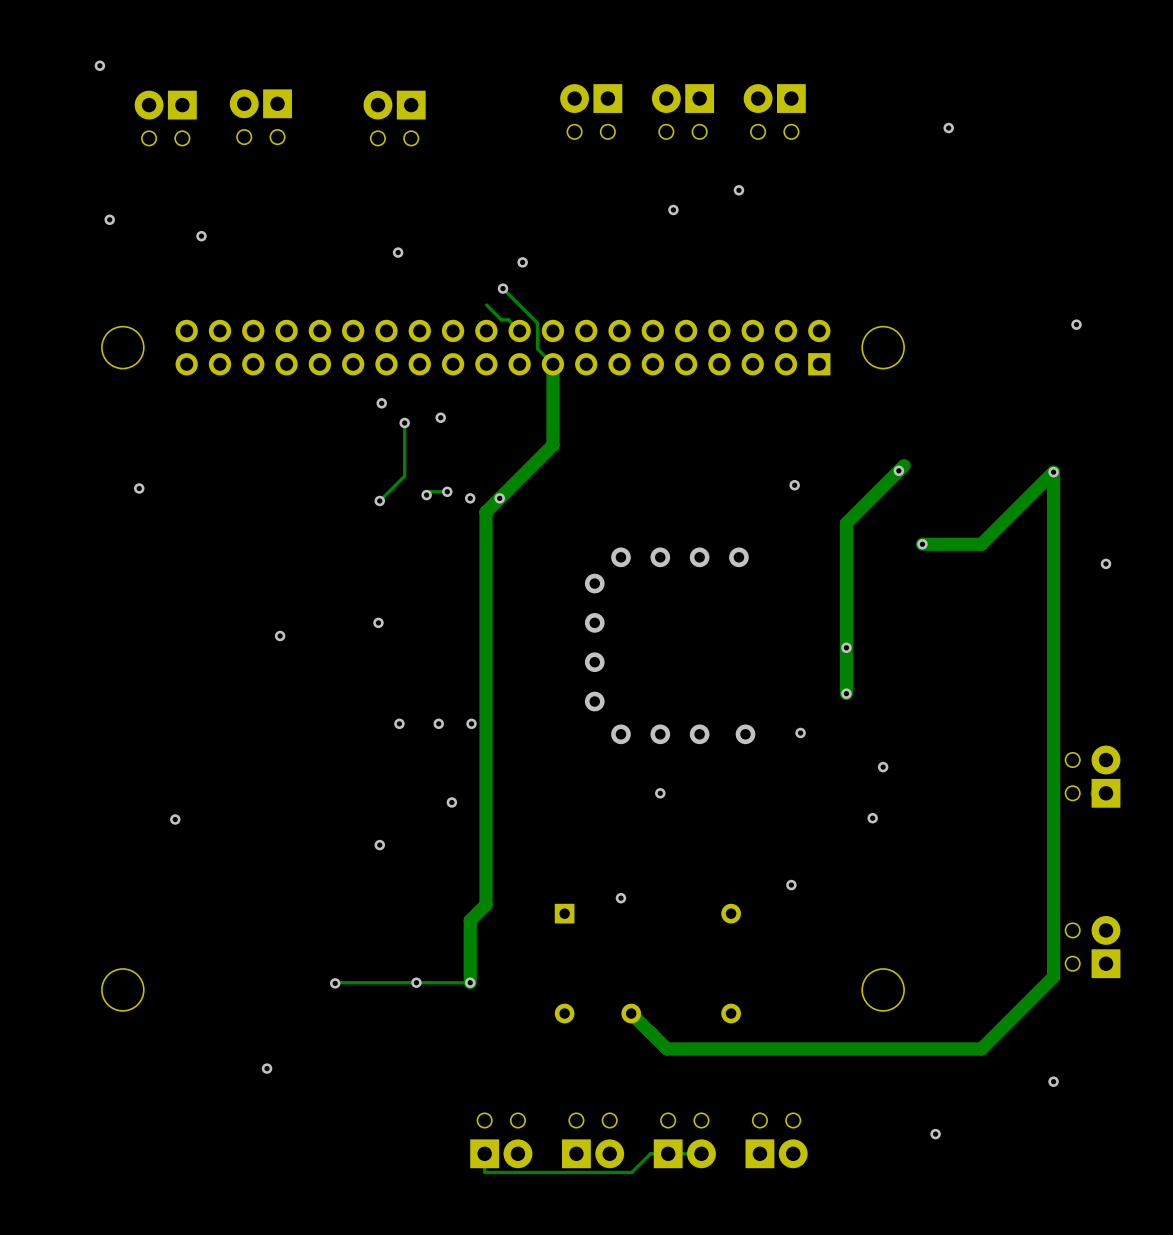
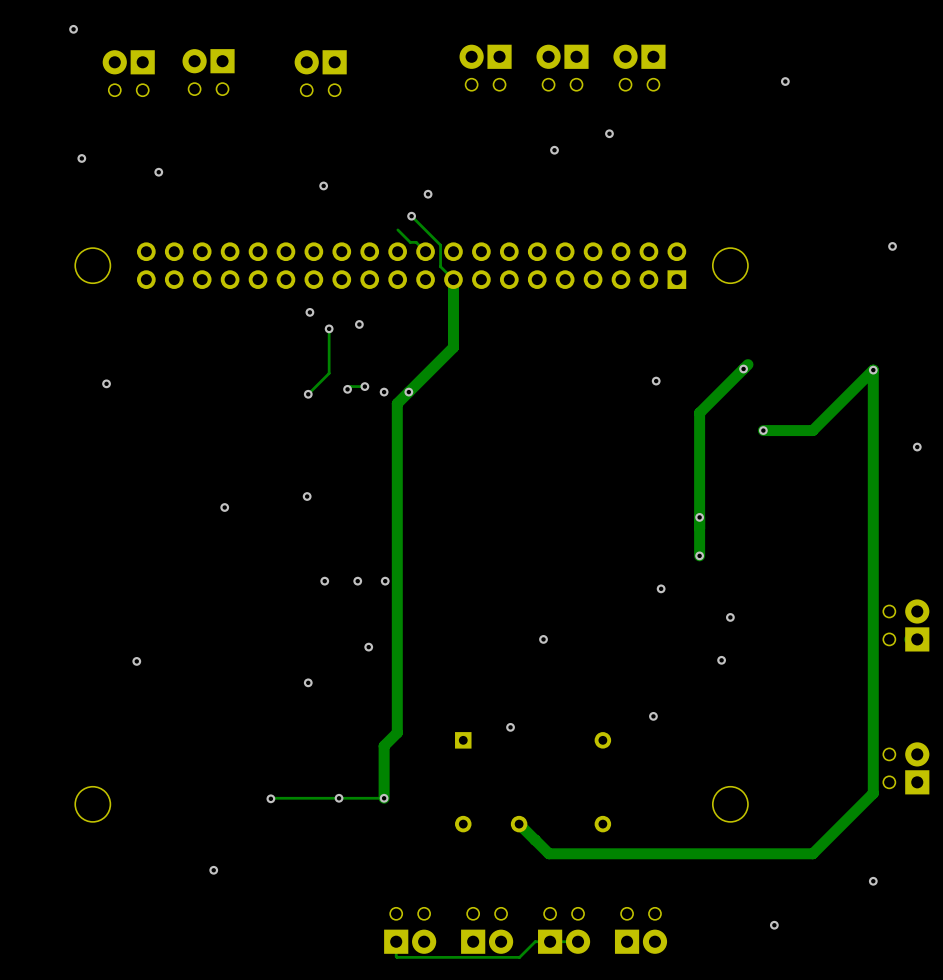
via: (620, 557) -> none
via: (660, 557) -> none
via: (699, 557) -> none
via: (738, 557) -> none
via: (594, 583) -> none
via: (594, 622) -> none
via: (594, 662) -> none
via: (594, 701) -> none
via: (620, 734) -> none
via: (660, 734) -> none
via: (699, 734) -> none
via: (745, 734) -> none

